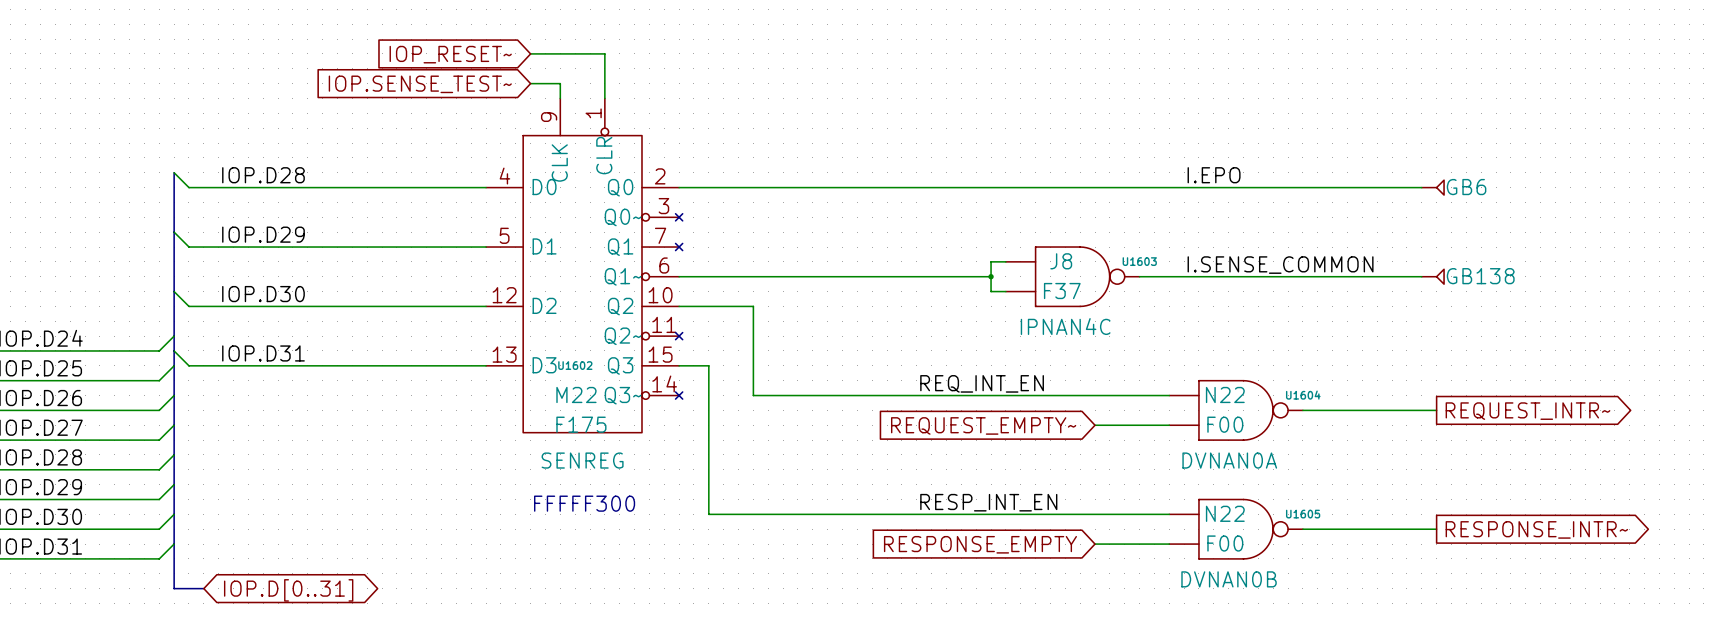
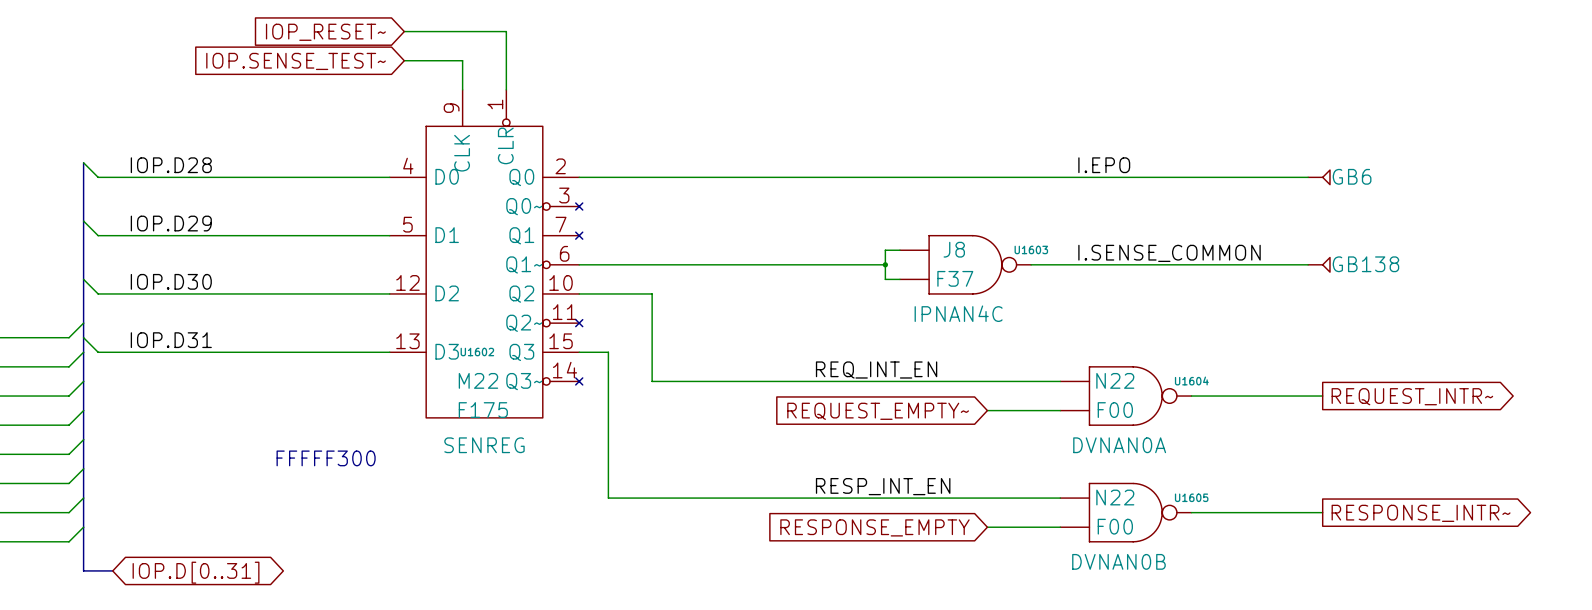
wire: (530, 53) (604, 53) -> (404, 31) (506, 31) (506, 46)
global label position: IOP_RESET~ (450, 54) -> IOP_RESET~ (325, 32)
wire: (530, 83) (560, 83) -> (404, 60) (462, 60) (462, 75)
global label position: IOP.SENSE_TEST~ (420, 84) -> IOP.SENSE_TEST~ (296, 61)
text: none -> FFFFF300 (326, 458)
text: FFFFF300 (584, 503) -> none

